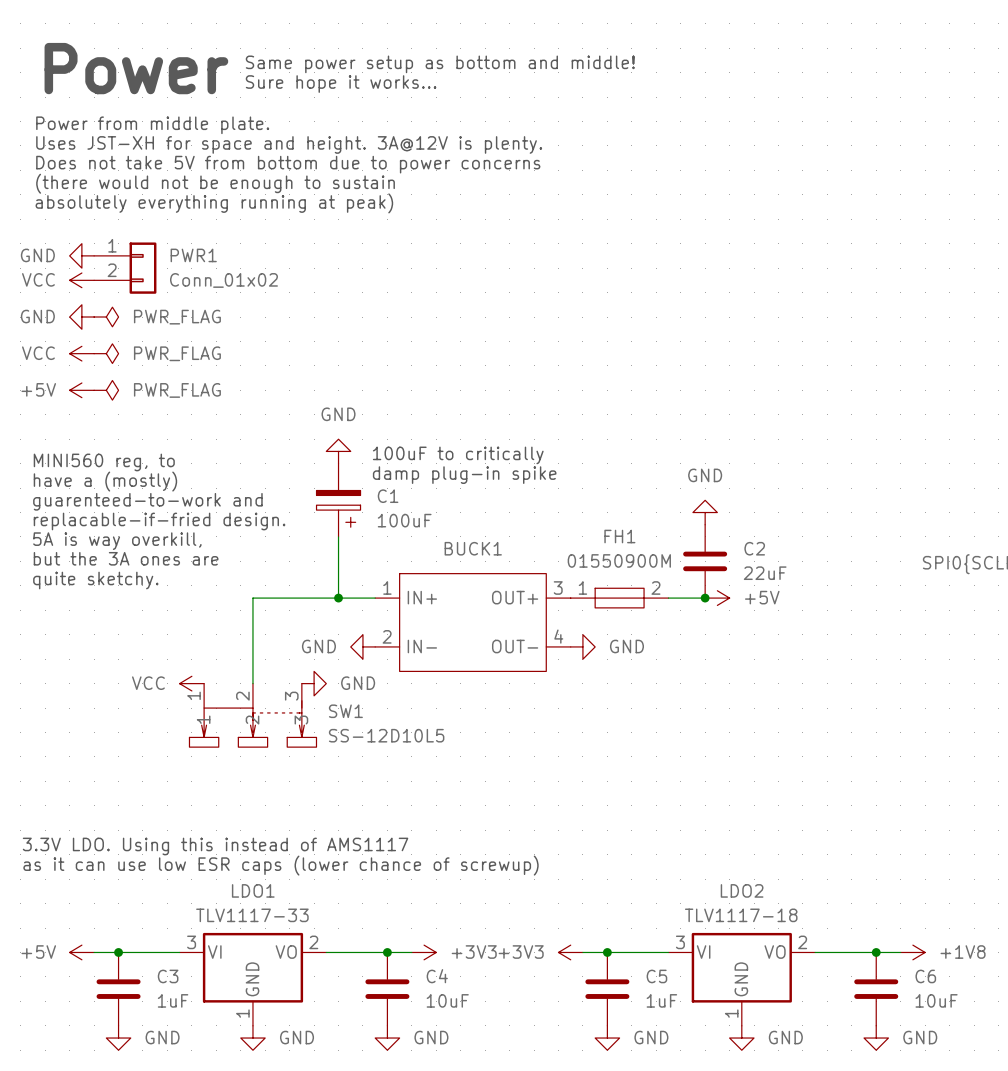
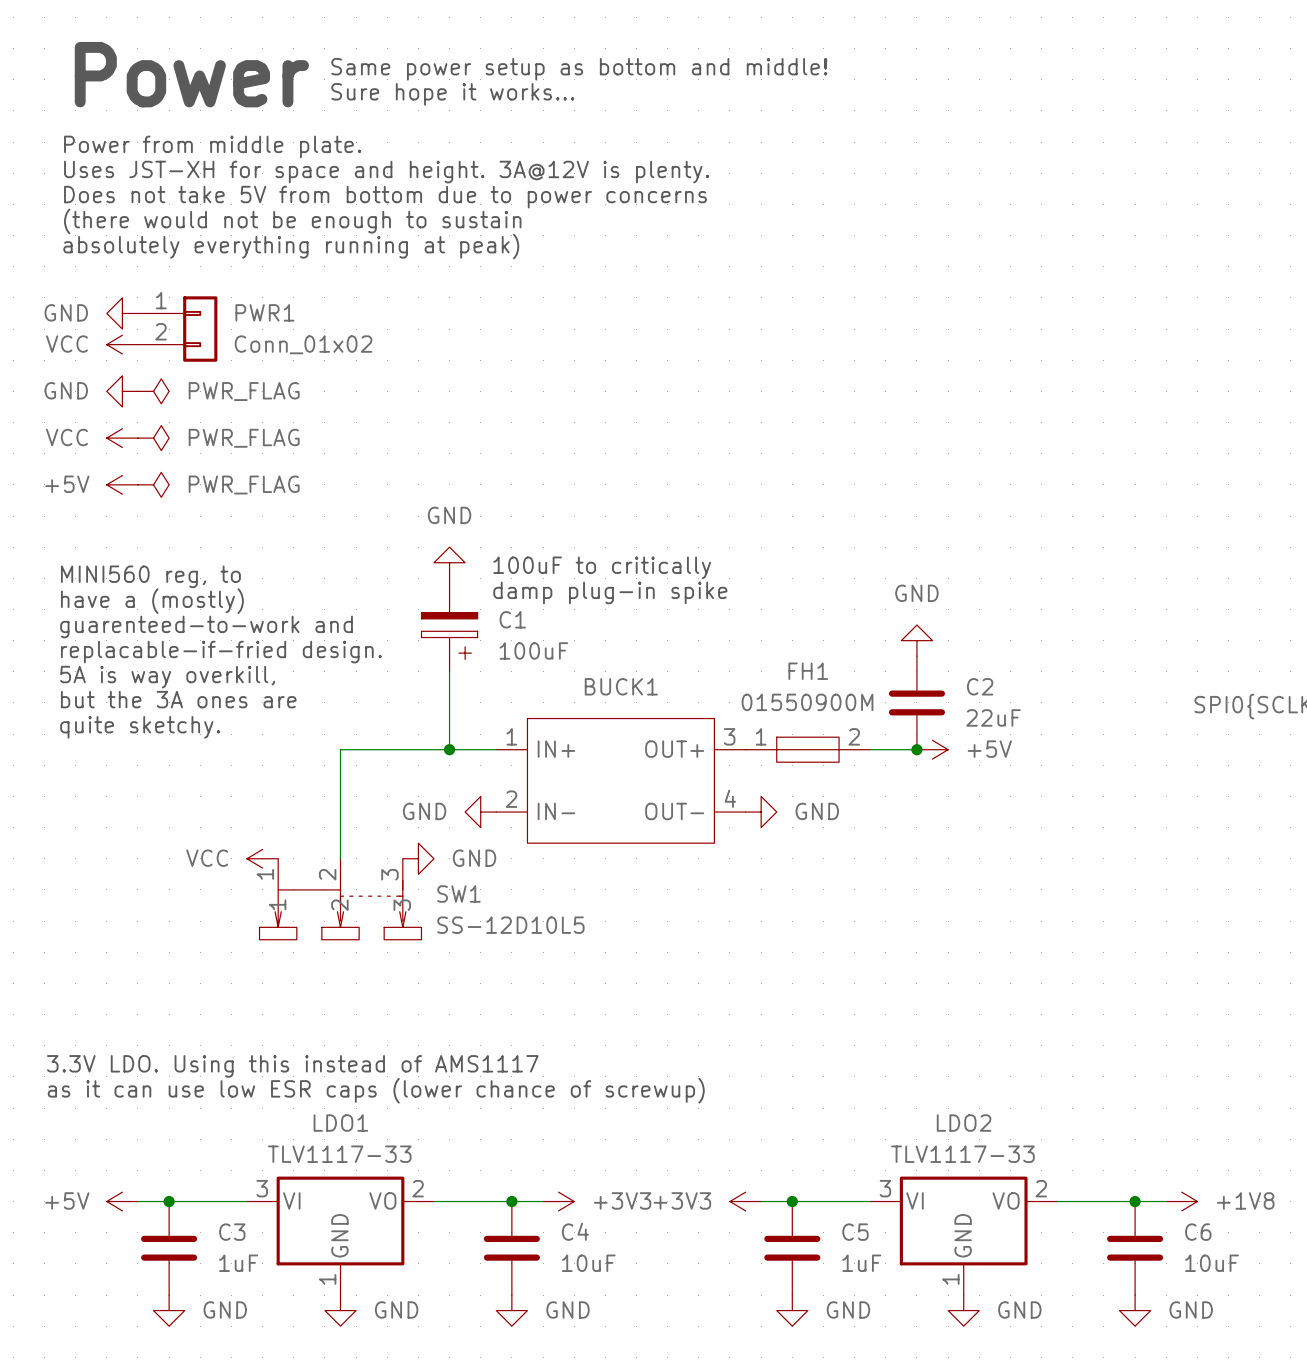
LDO2 value: TLV1117-18 (741, 915) -> TLV1117-33 (962, 1154)

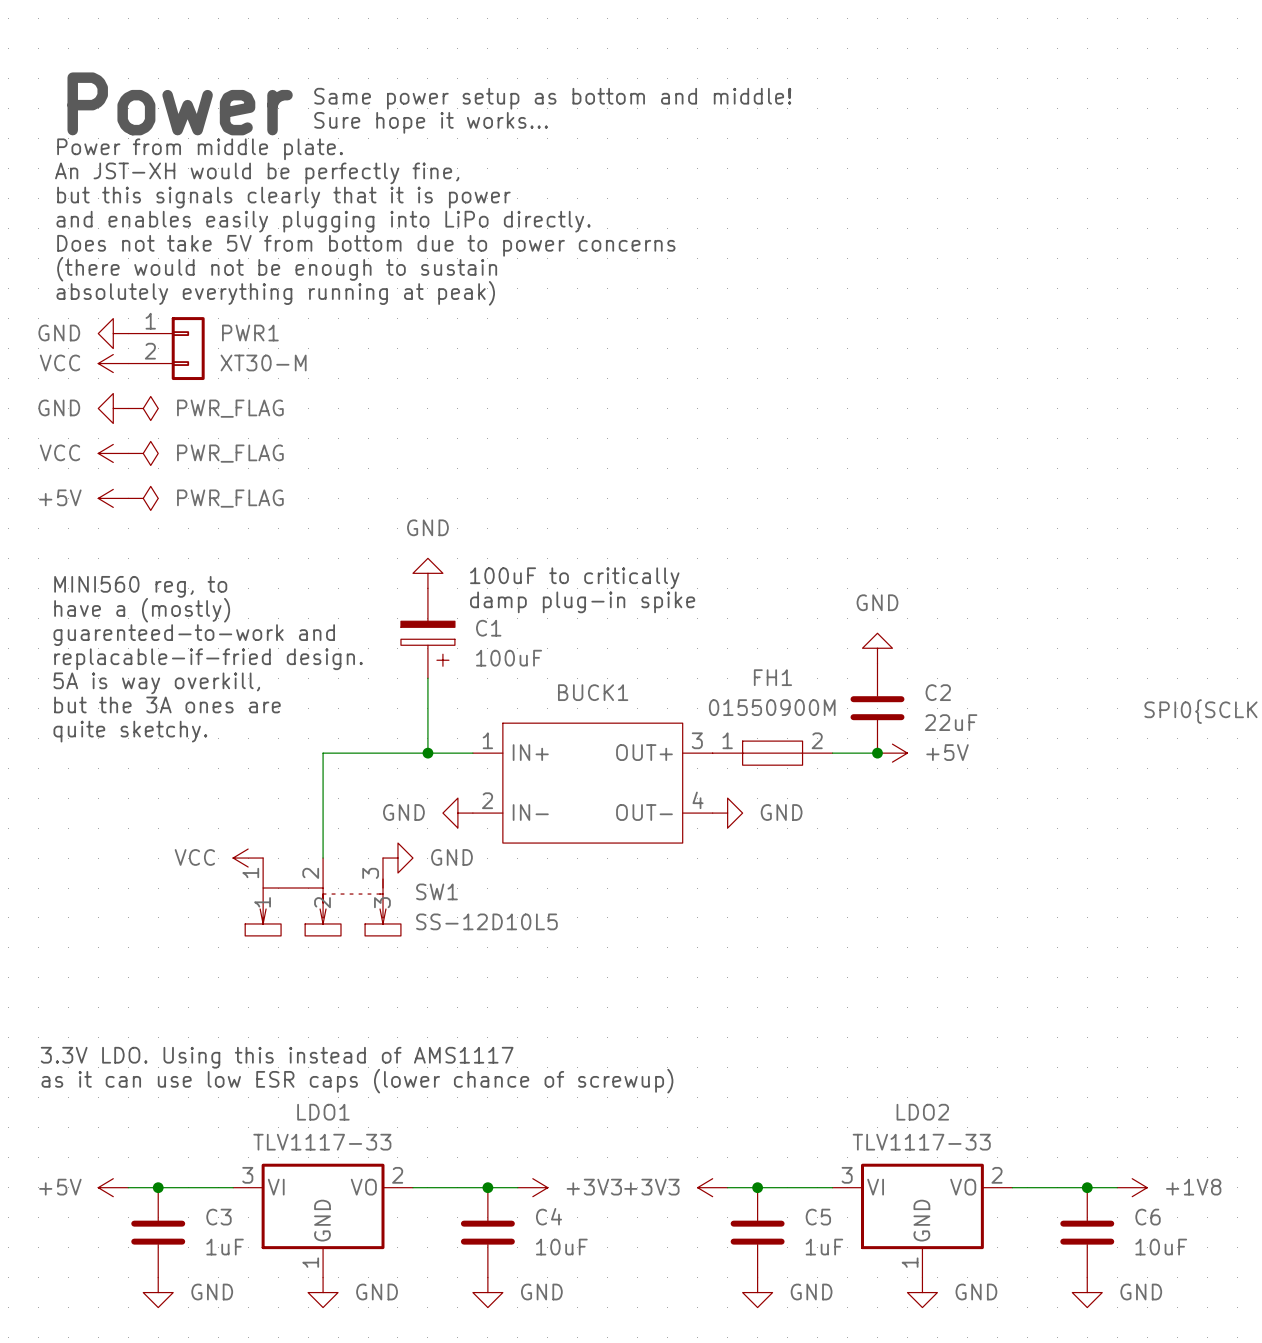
text: none -> Power from middle plate. (200, 149)
text: Power from middle plate. (212, 146) -> An JST-XH would be perfectly fine, (257, 173)
text: Uses JST-XH for space and height. 3A@12V is plenty. (386, 172) -> but this signals clearly that it is power (283, 197)
text: Does not take 5V from bottom due to power concerns (385, 197) -> and enables easily plugging into LiPo directly. (323, 221)
text: (there would not be enough to sustain (292, 221) -> Does not take 5V from bottom due to power concerns (366, 245)
text: absolutely everything running at peak) (291, 246) -> (there would not be enough to sustain (277, 269)
text: none -> absolutely everything running at peak) (275, 293)
PWR1 value: Conn_01x02 (303, 344) -> XT30-M (263, 362)

